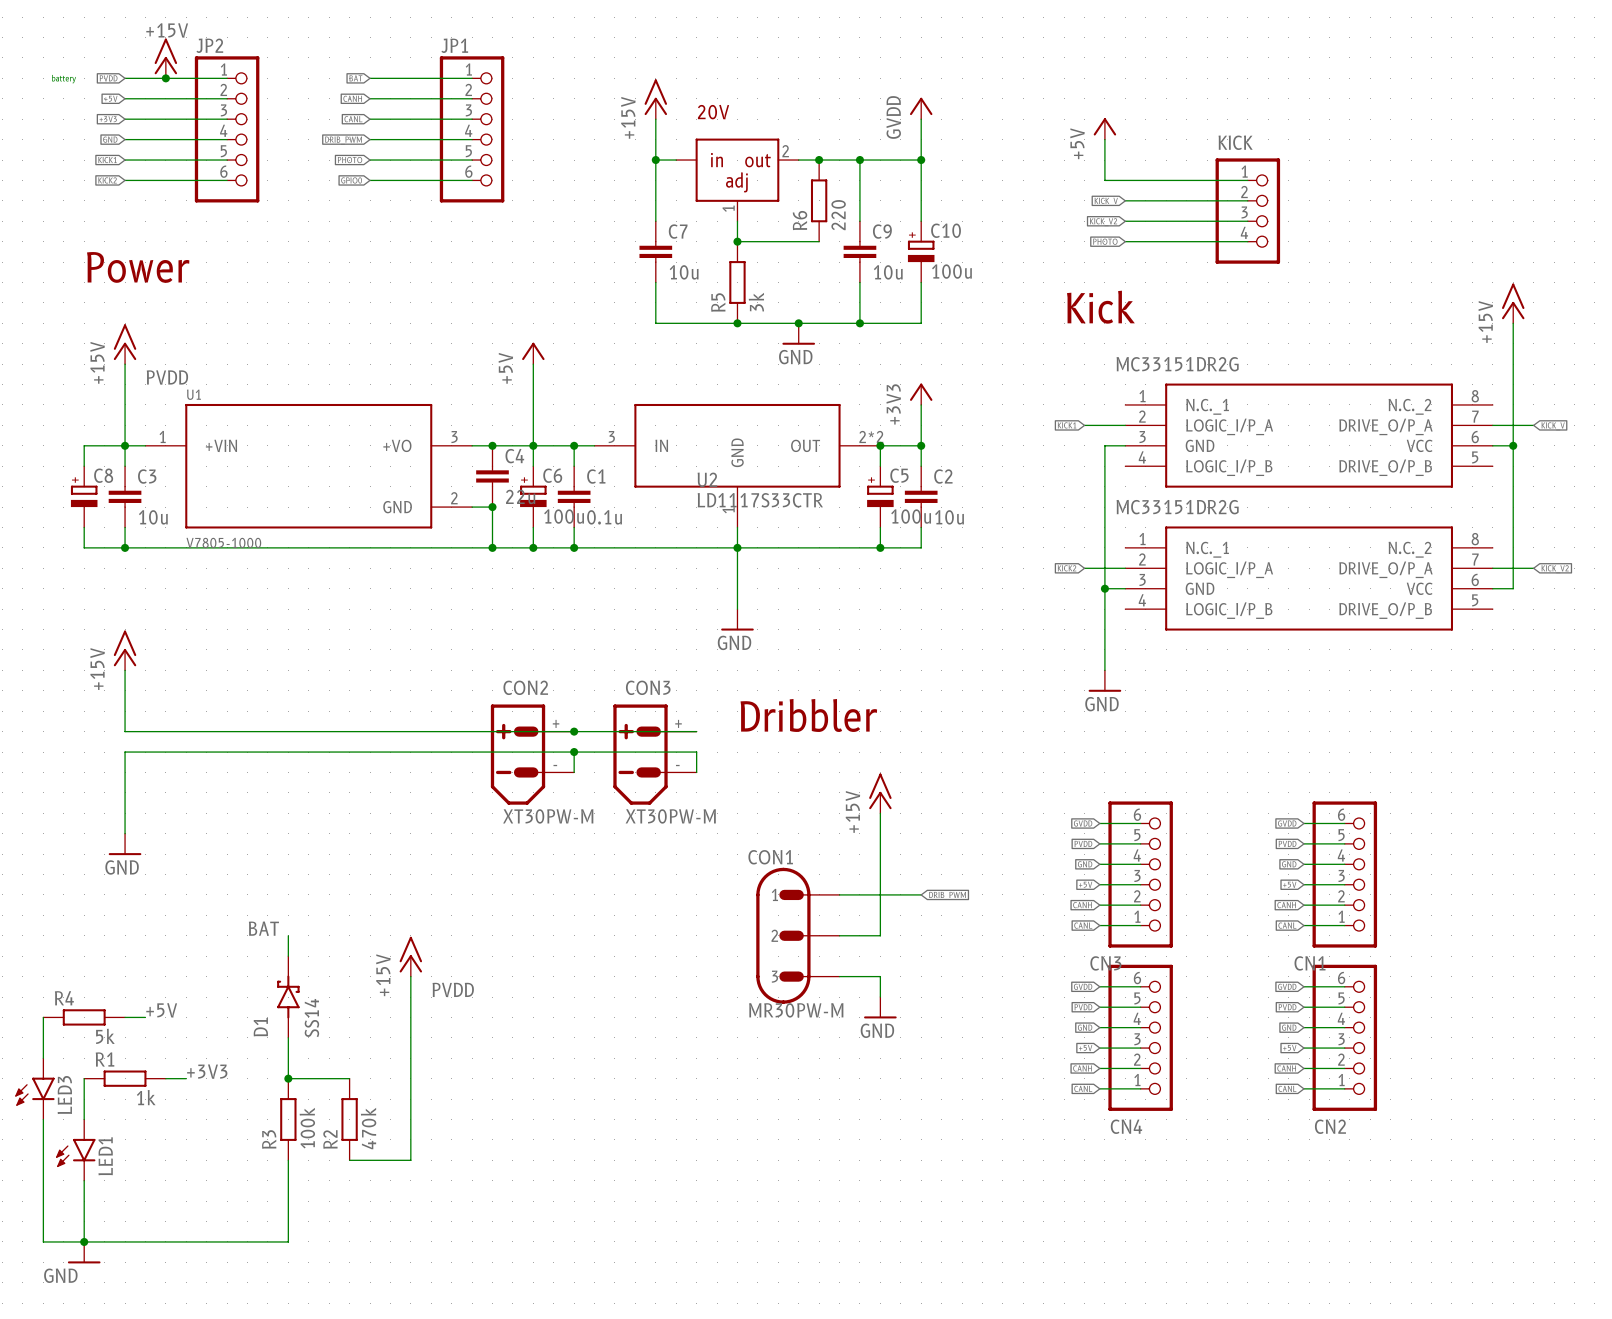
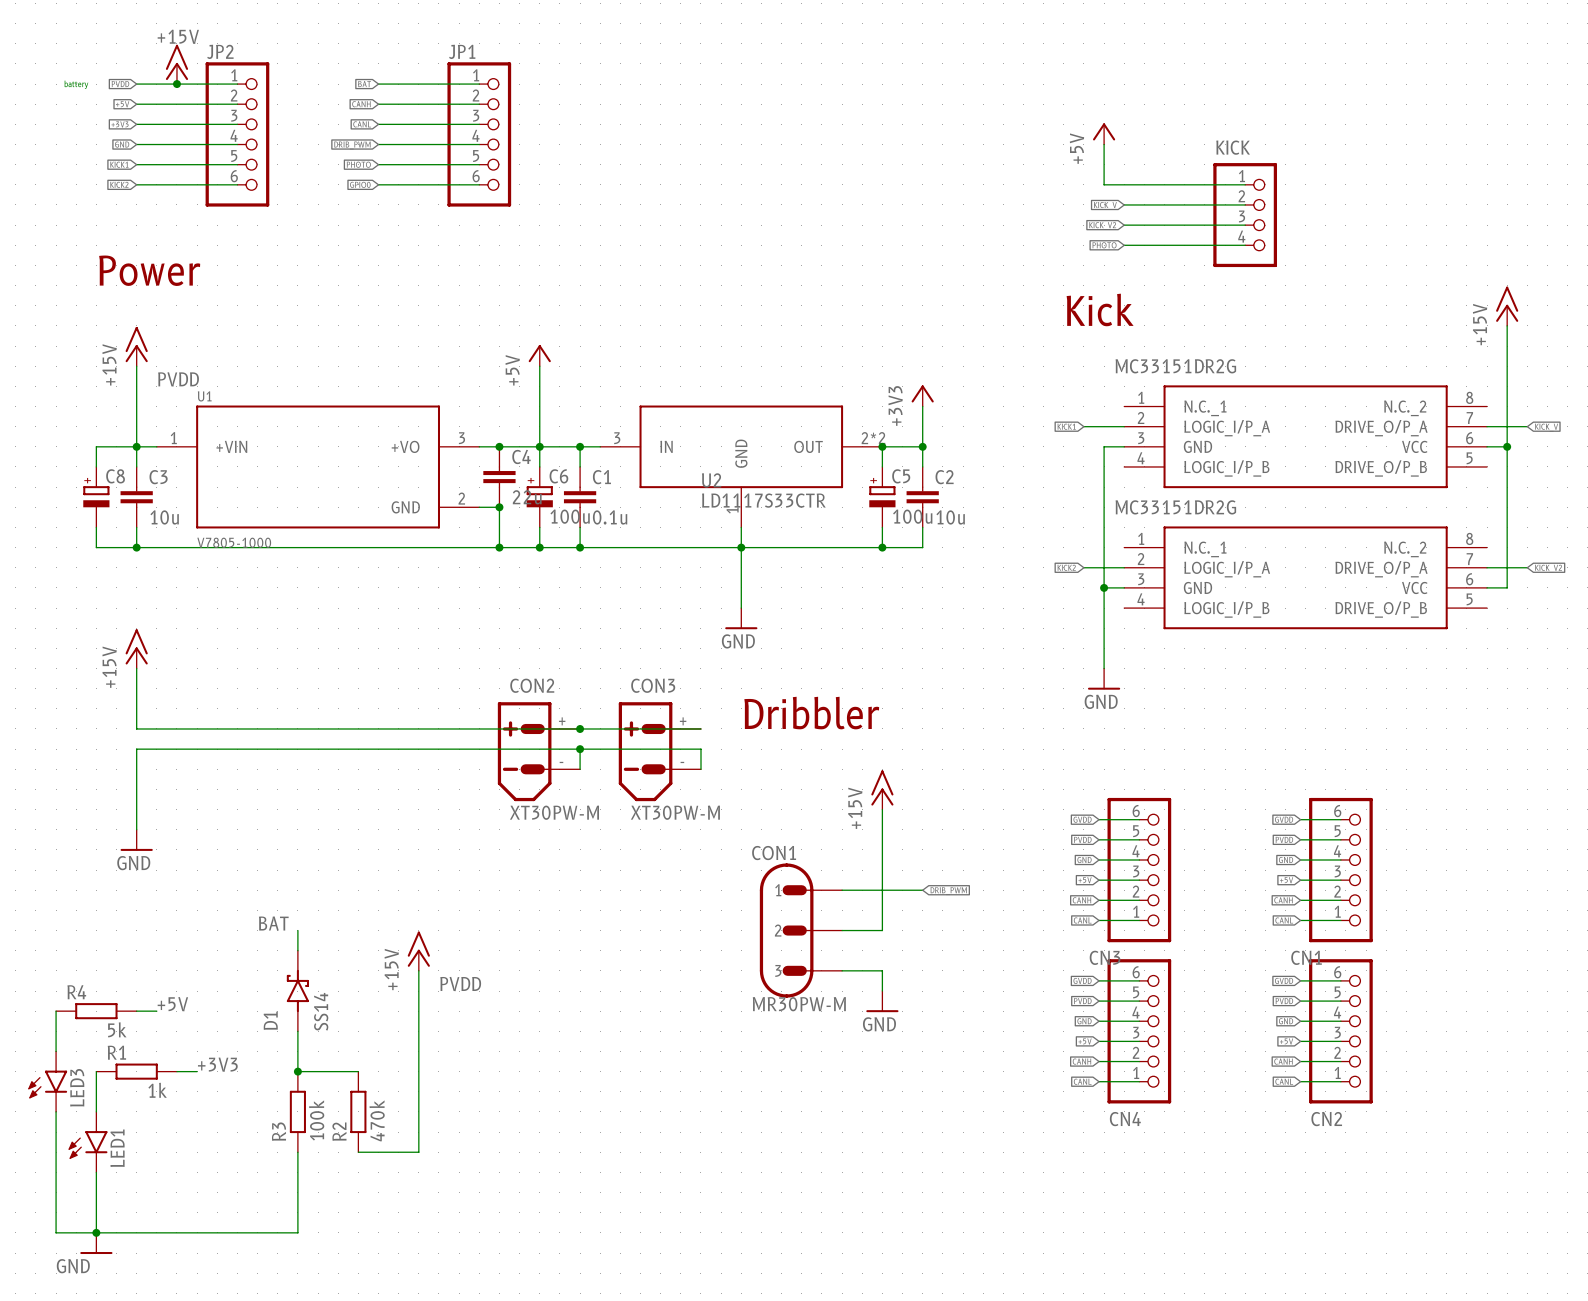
power symbol: +15V (655, 99) -> none
power symbol: GVDD (921, 108) -> none
text: 20V (713, 112) -> none
wire: (655, 119) (655, 221) -> none
wire: (921, 119) (921, 221) -> none
wire: (655, 160) (676, 160) -> none
junction: (655, 160) -> none
wire: (798, 160) (921, 160) -> none
junction: (819, 160) -> none
wire: (859, 160) (859, 221) -> none
junction: (859, 160) -> none
junction: (921, 160) -> none
part: (737, 179) -> none
R6: 220 (819, 200) -> none
wire: (737, 221) (737, 241) (819, 241) -> none
junction: (737, 241) -> none
C7: 10u (655, 251) -> none
C9: 10u (859, 251) -> none
C10: 100u (921, 251) -> none
wire: (655, 282) (655, 323) (921, 323) (921, 282) -> none
R5: 3k (737, 282) -> none
wire: (859, 282) (859, 323) -> none
junction: (737, 323) -> none
junction: (798, 323) -> none
junction: (859, 323) -> none
power symbol: GND (798, 334) -> none

